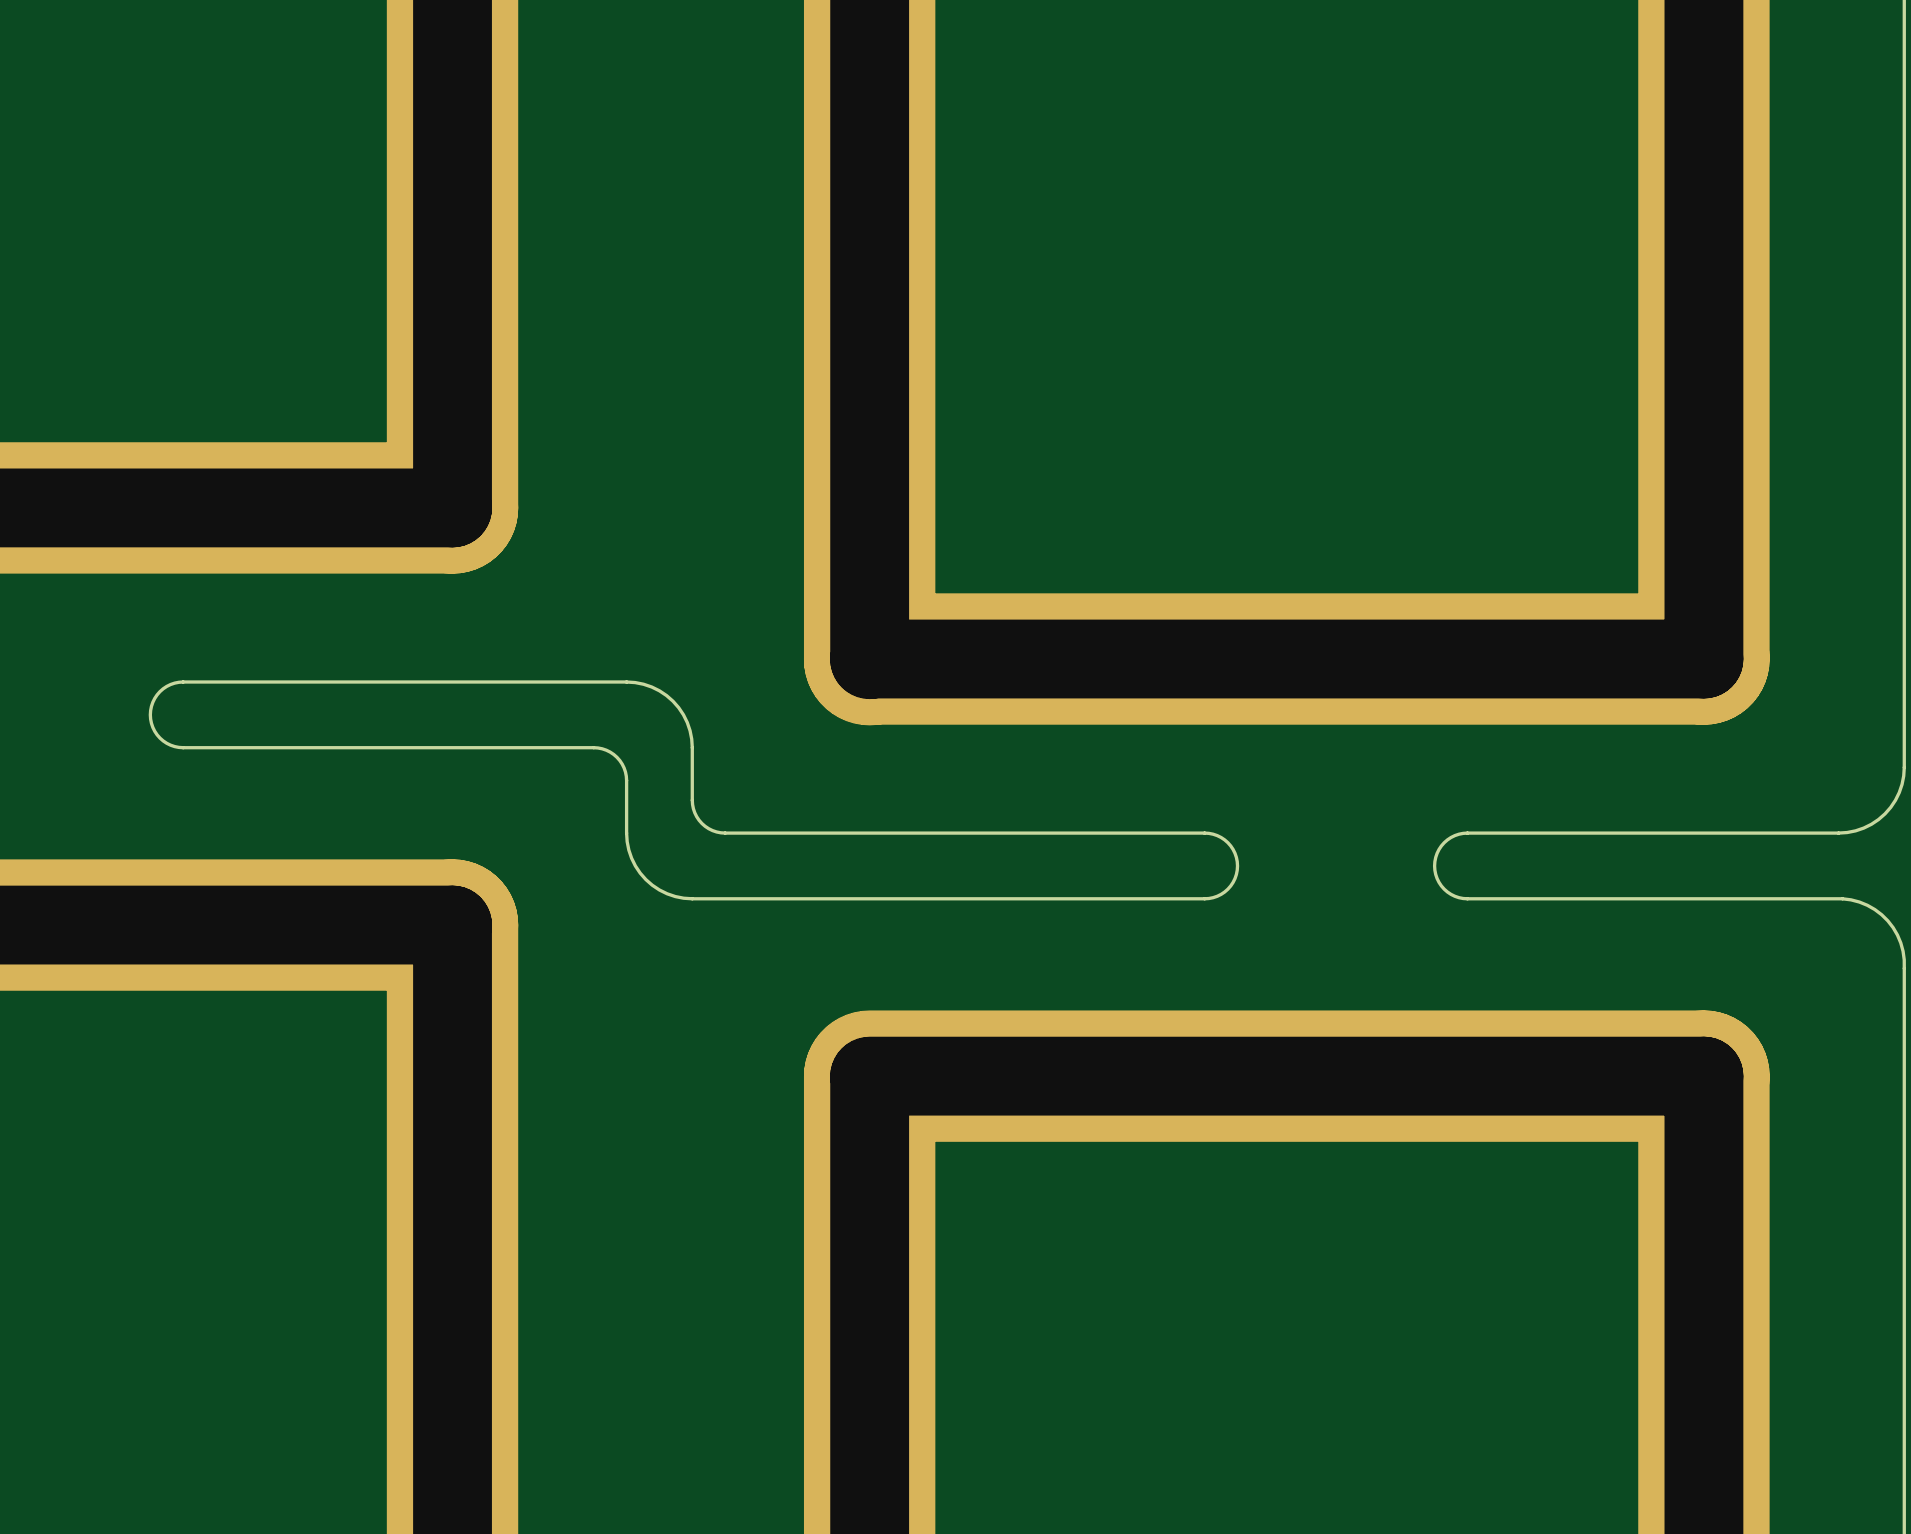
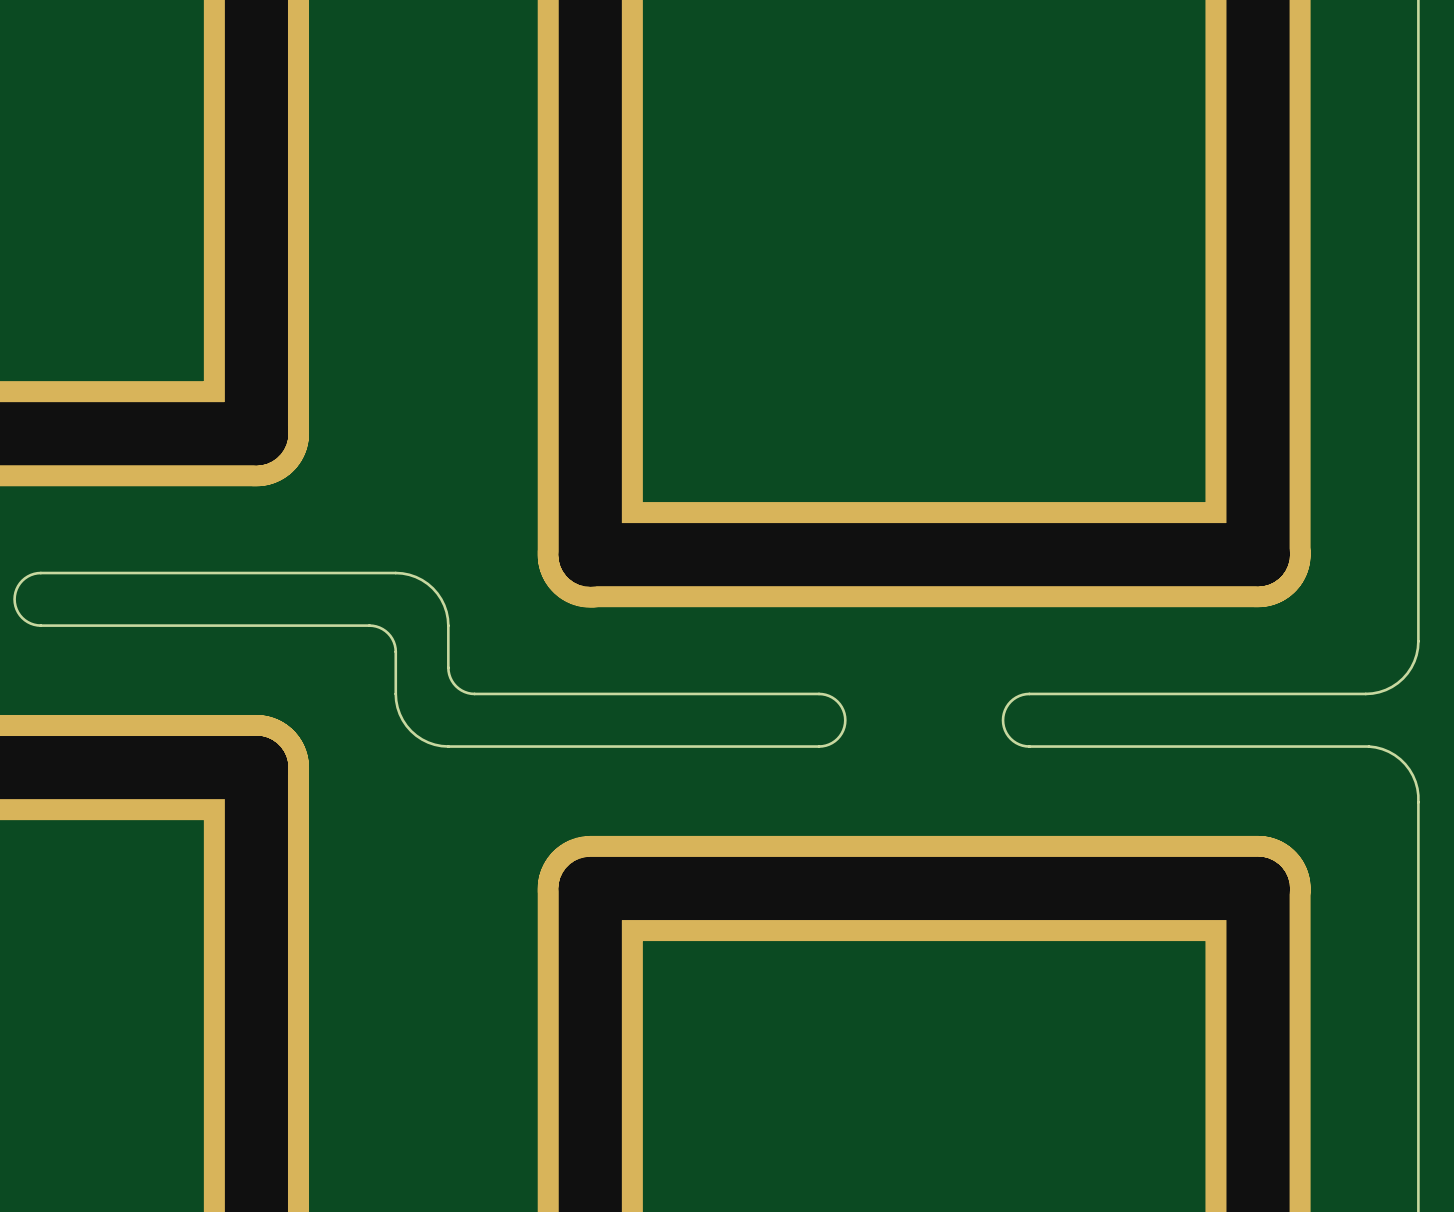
board edge: (1155, 833) (1204, 833) (1217, 835) (1230, 845) (1235, 853) (1237, 865) (1235, 878) (1230, 885) (1217, 896) (1204, 898) (1155, 898) -> (819, 693) (829, 695) (837, 701) (843, 710) (845, 720) (843, 730) (837, 738) (829, 744) (819, 746)
board edge: (1467, 833) (1454, 835) (1444, 842) (1437, 853) (1434, 865) (1437, 878) (1444, 889) (1454, 896) (1467, 898) -> (1068, 693) (1029, 693) (1019, 695) (1008, 704) (1003, 720) (1008, 736) (1019, 744) (1029, 746) (1068, 746)

